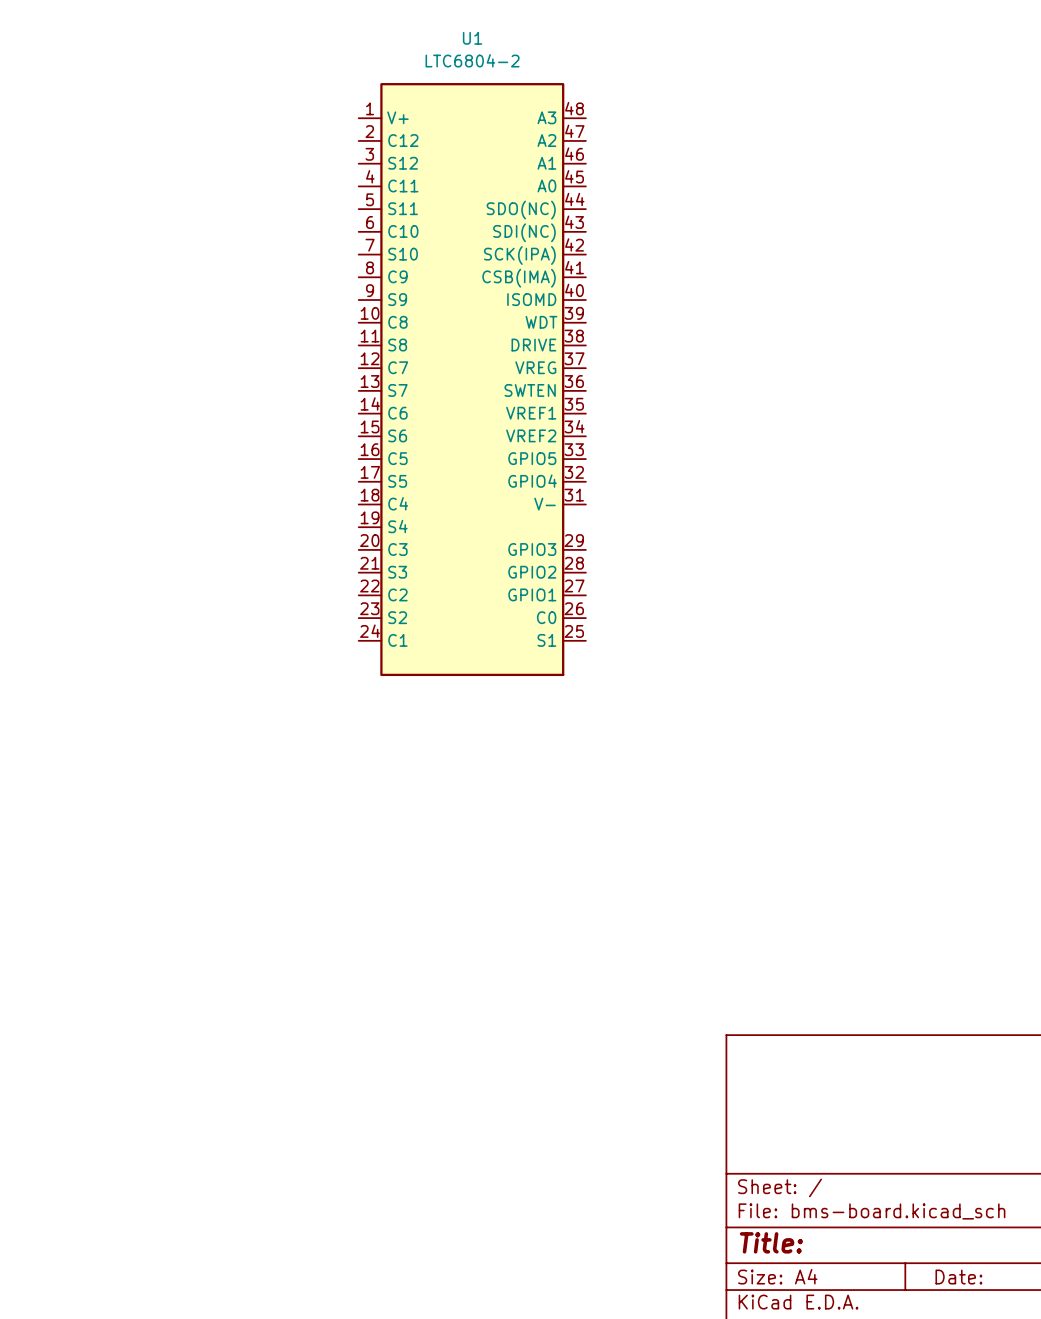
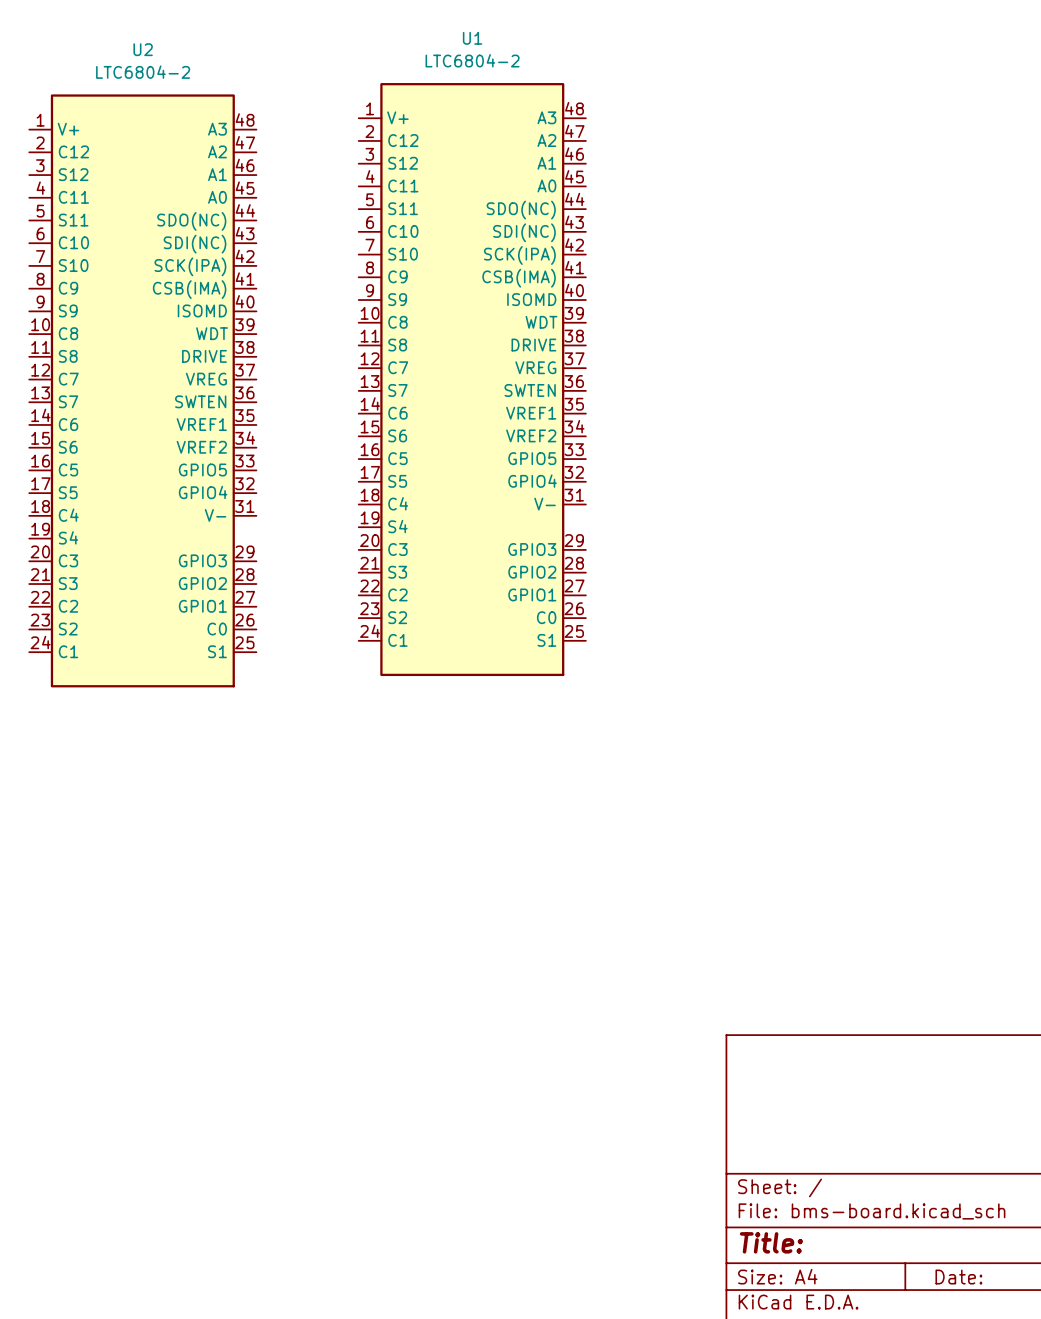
U2: none -> LTC6804-2 (142, 390)

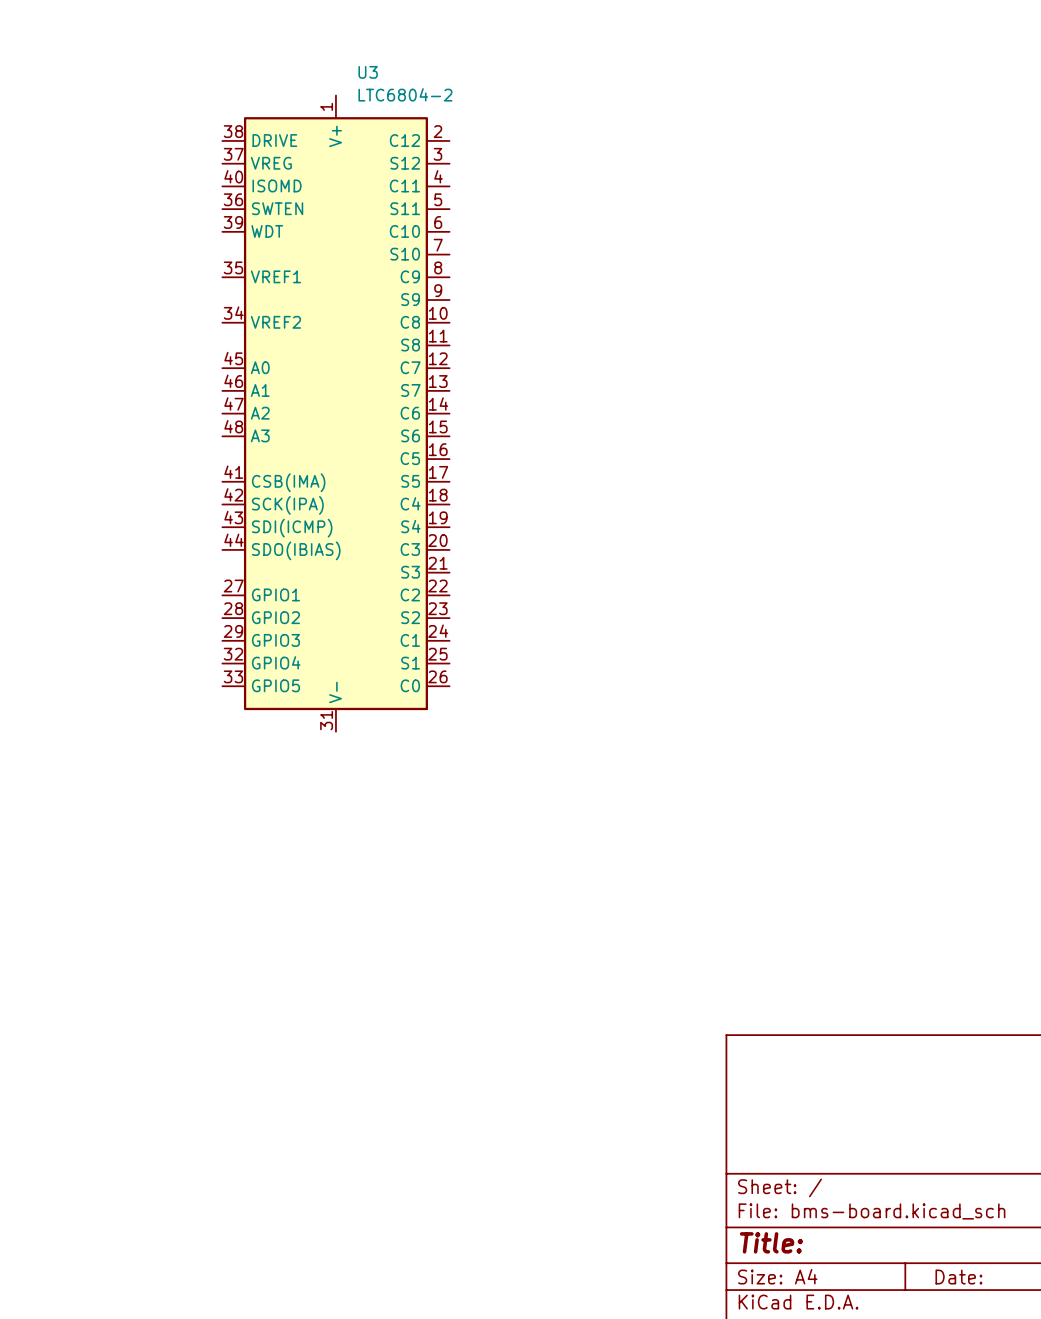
U1: LTC6804-2 (472, 379) -> none
U2: LTC6804-2 (142, 390) -> none
U3: none -> LTC6804-2 (335, 413)

